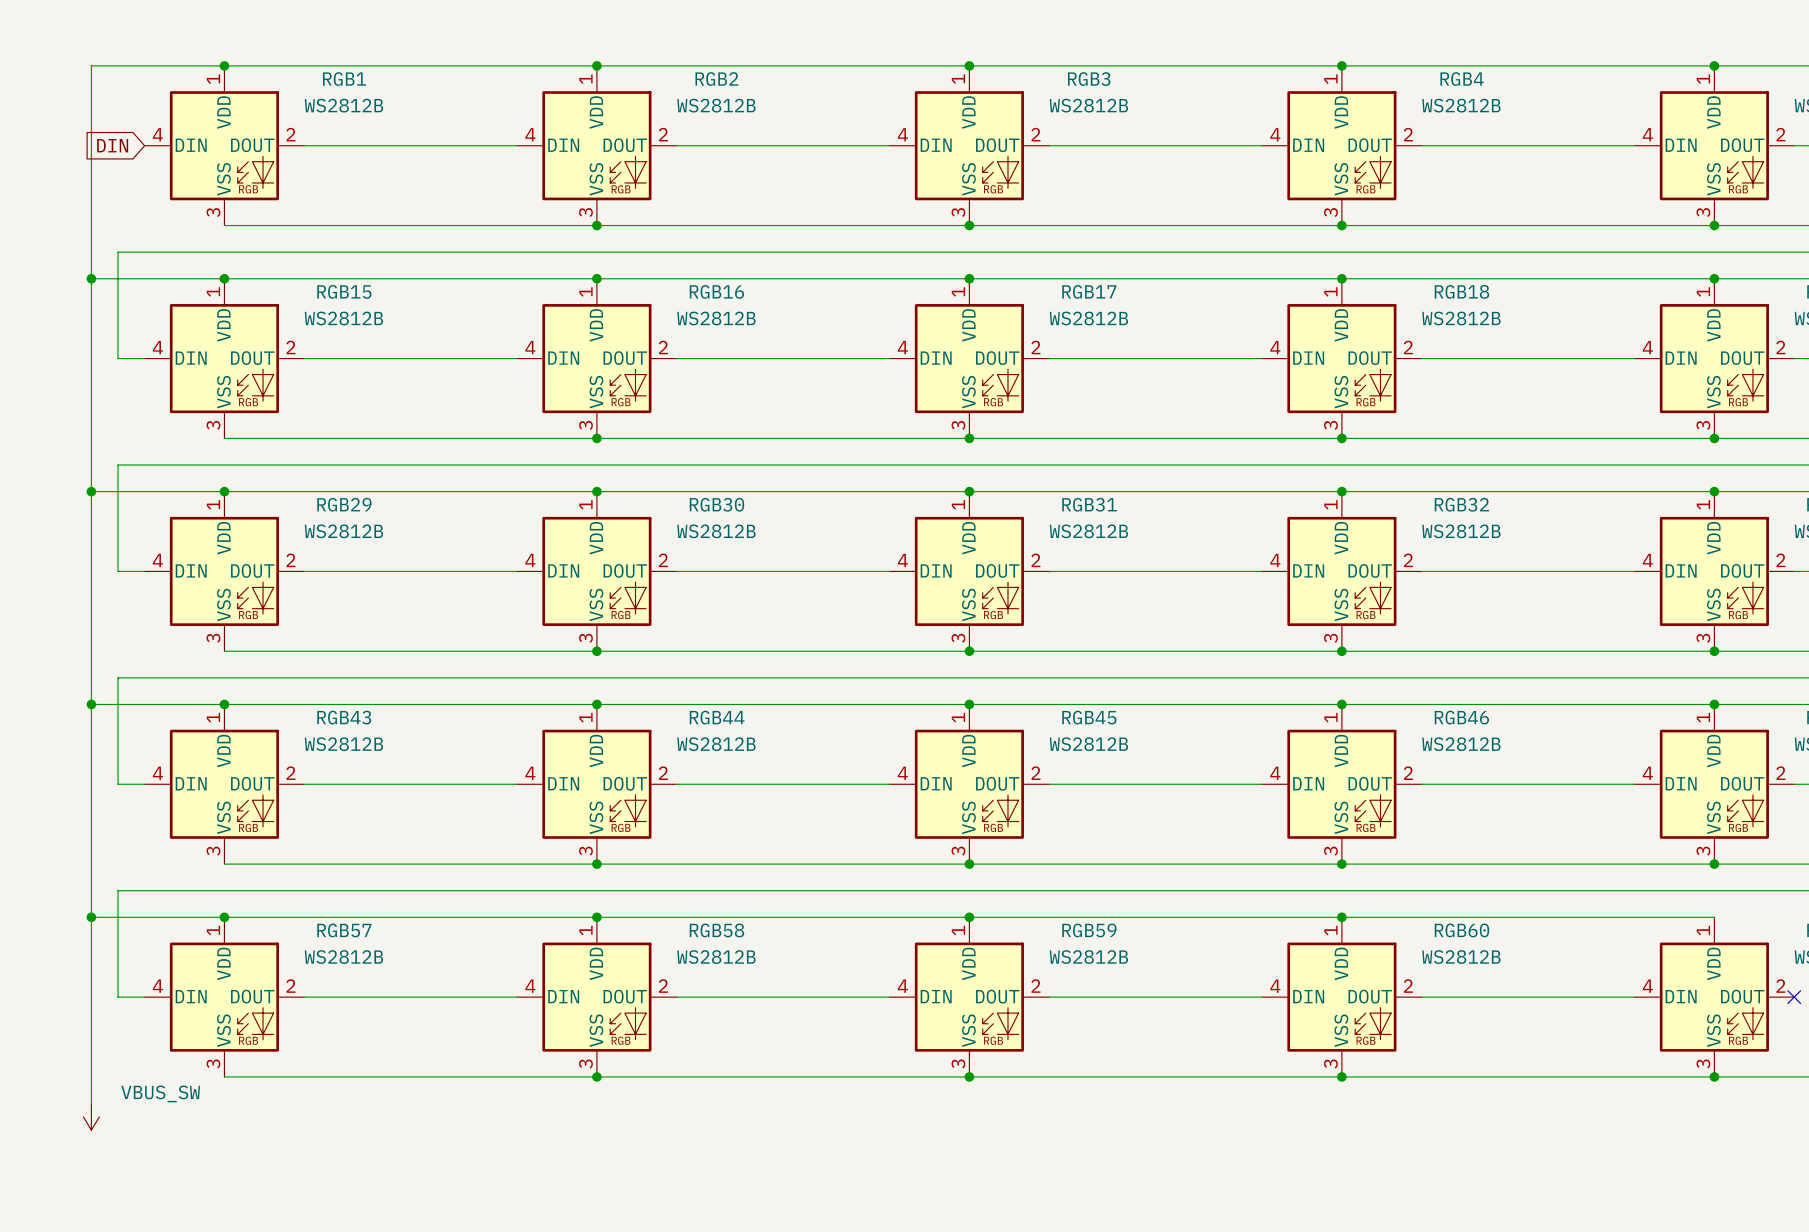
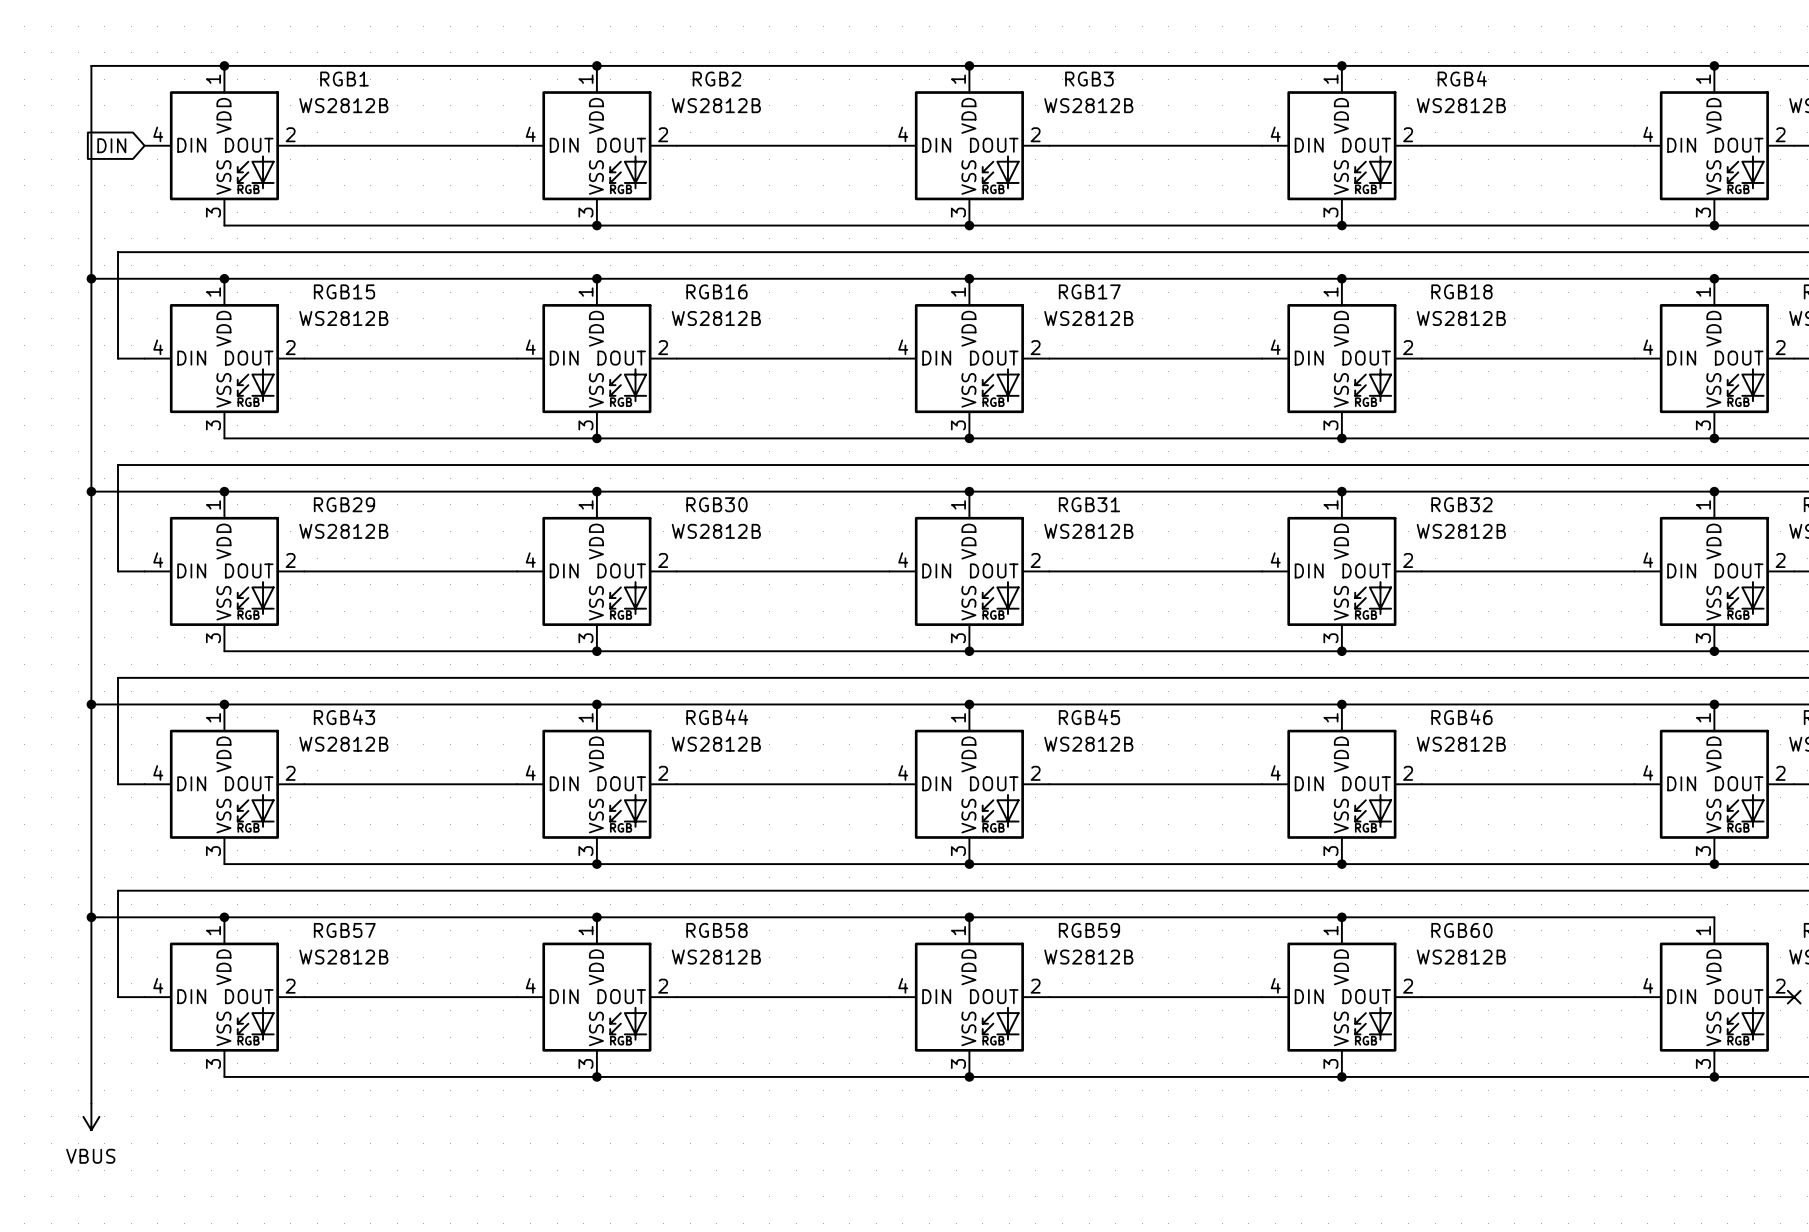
power symbol: VBUS_SW (91, 1116) -> VBUS (91, 1116)

